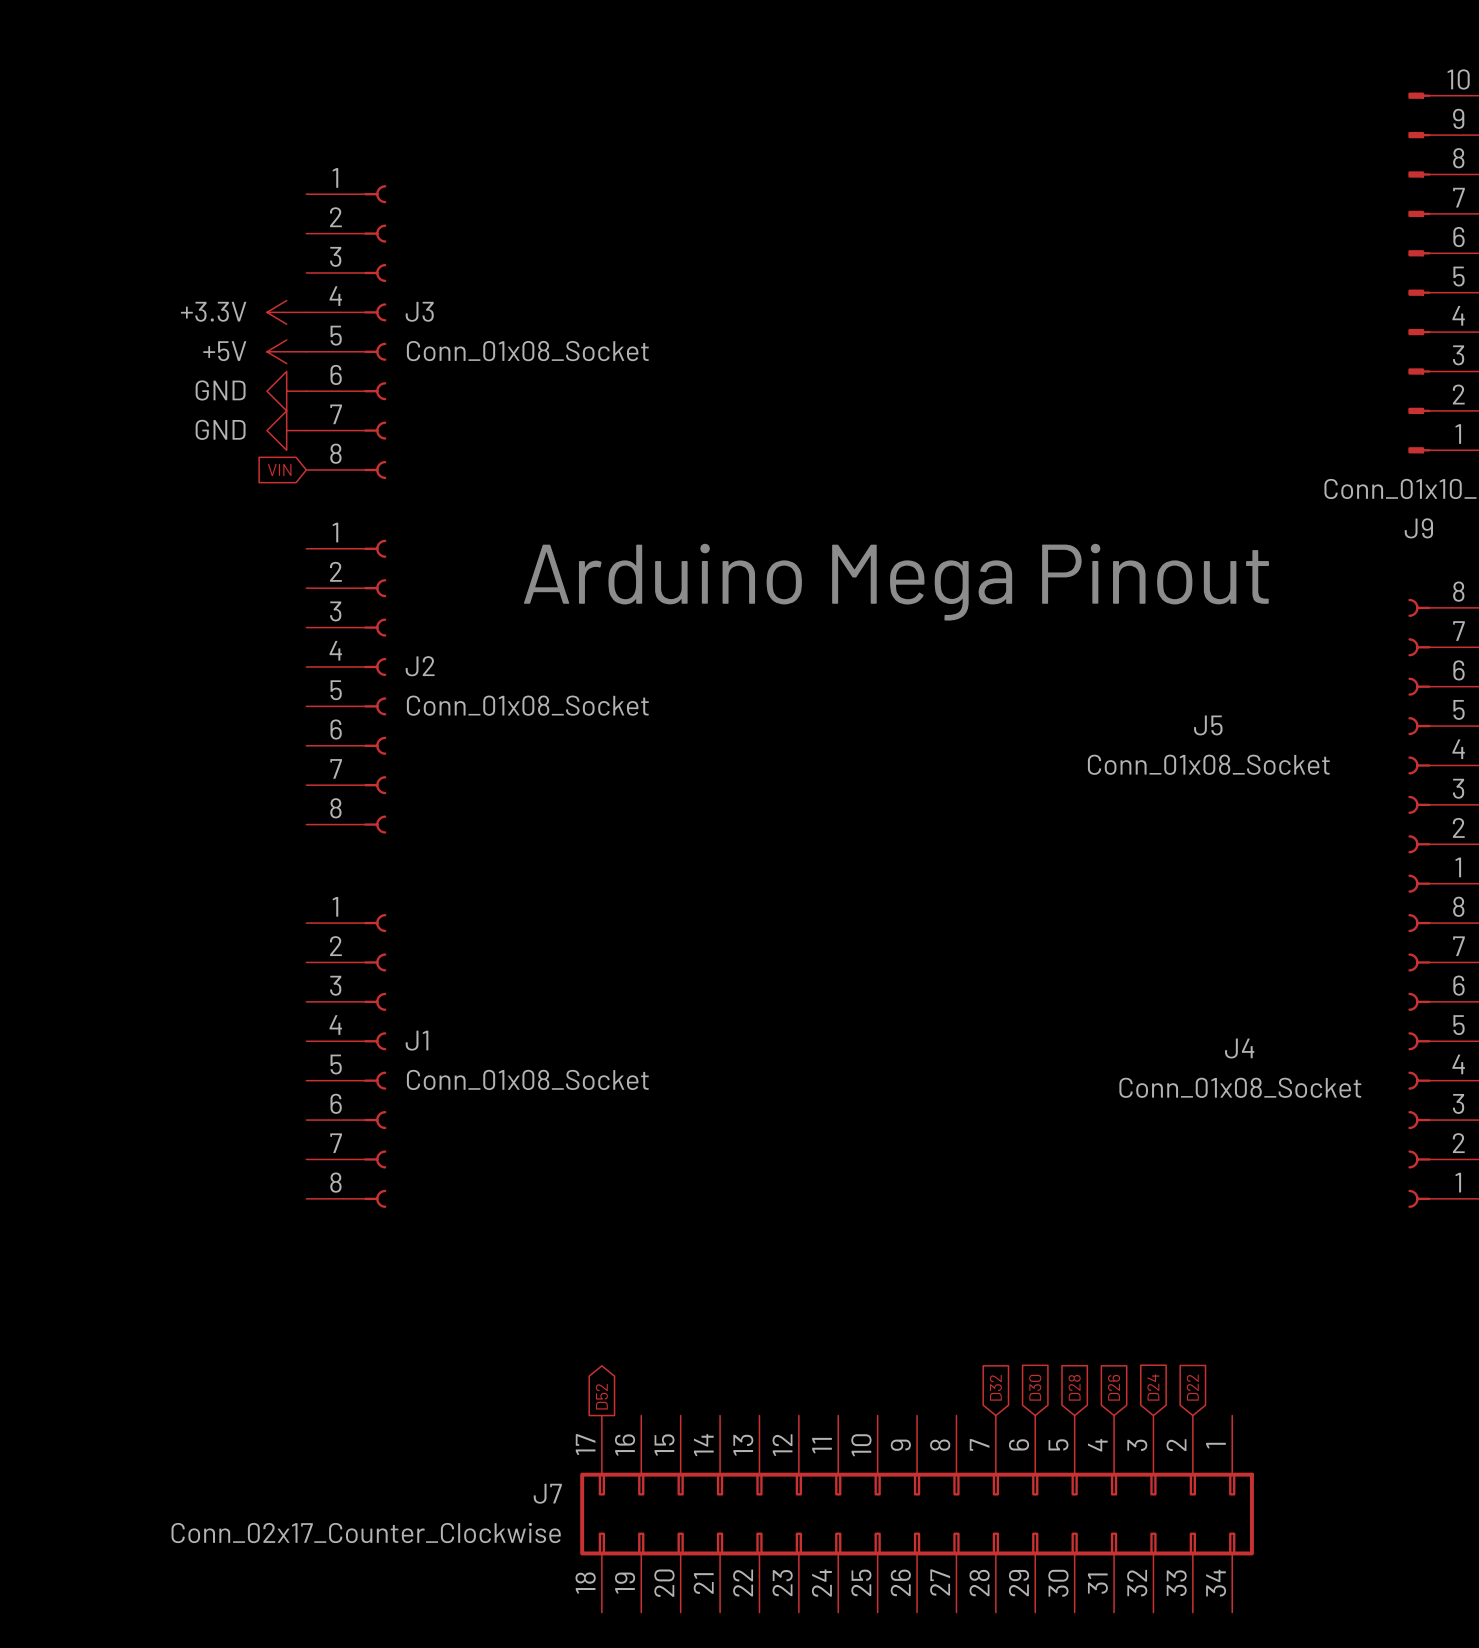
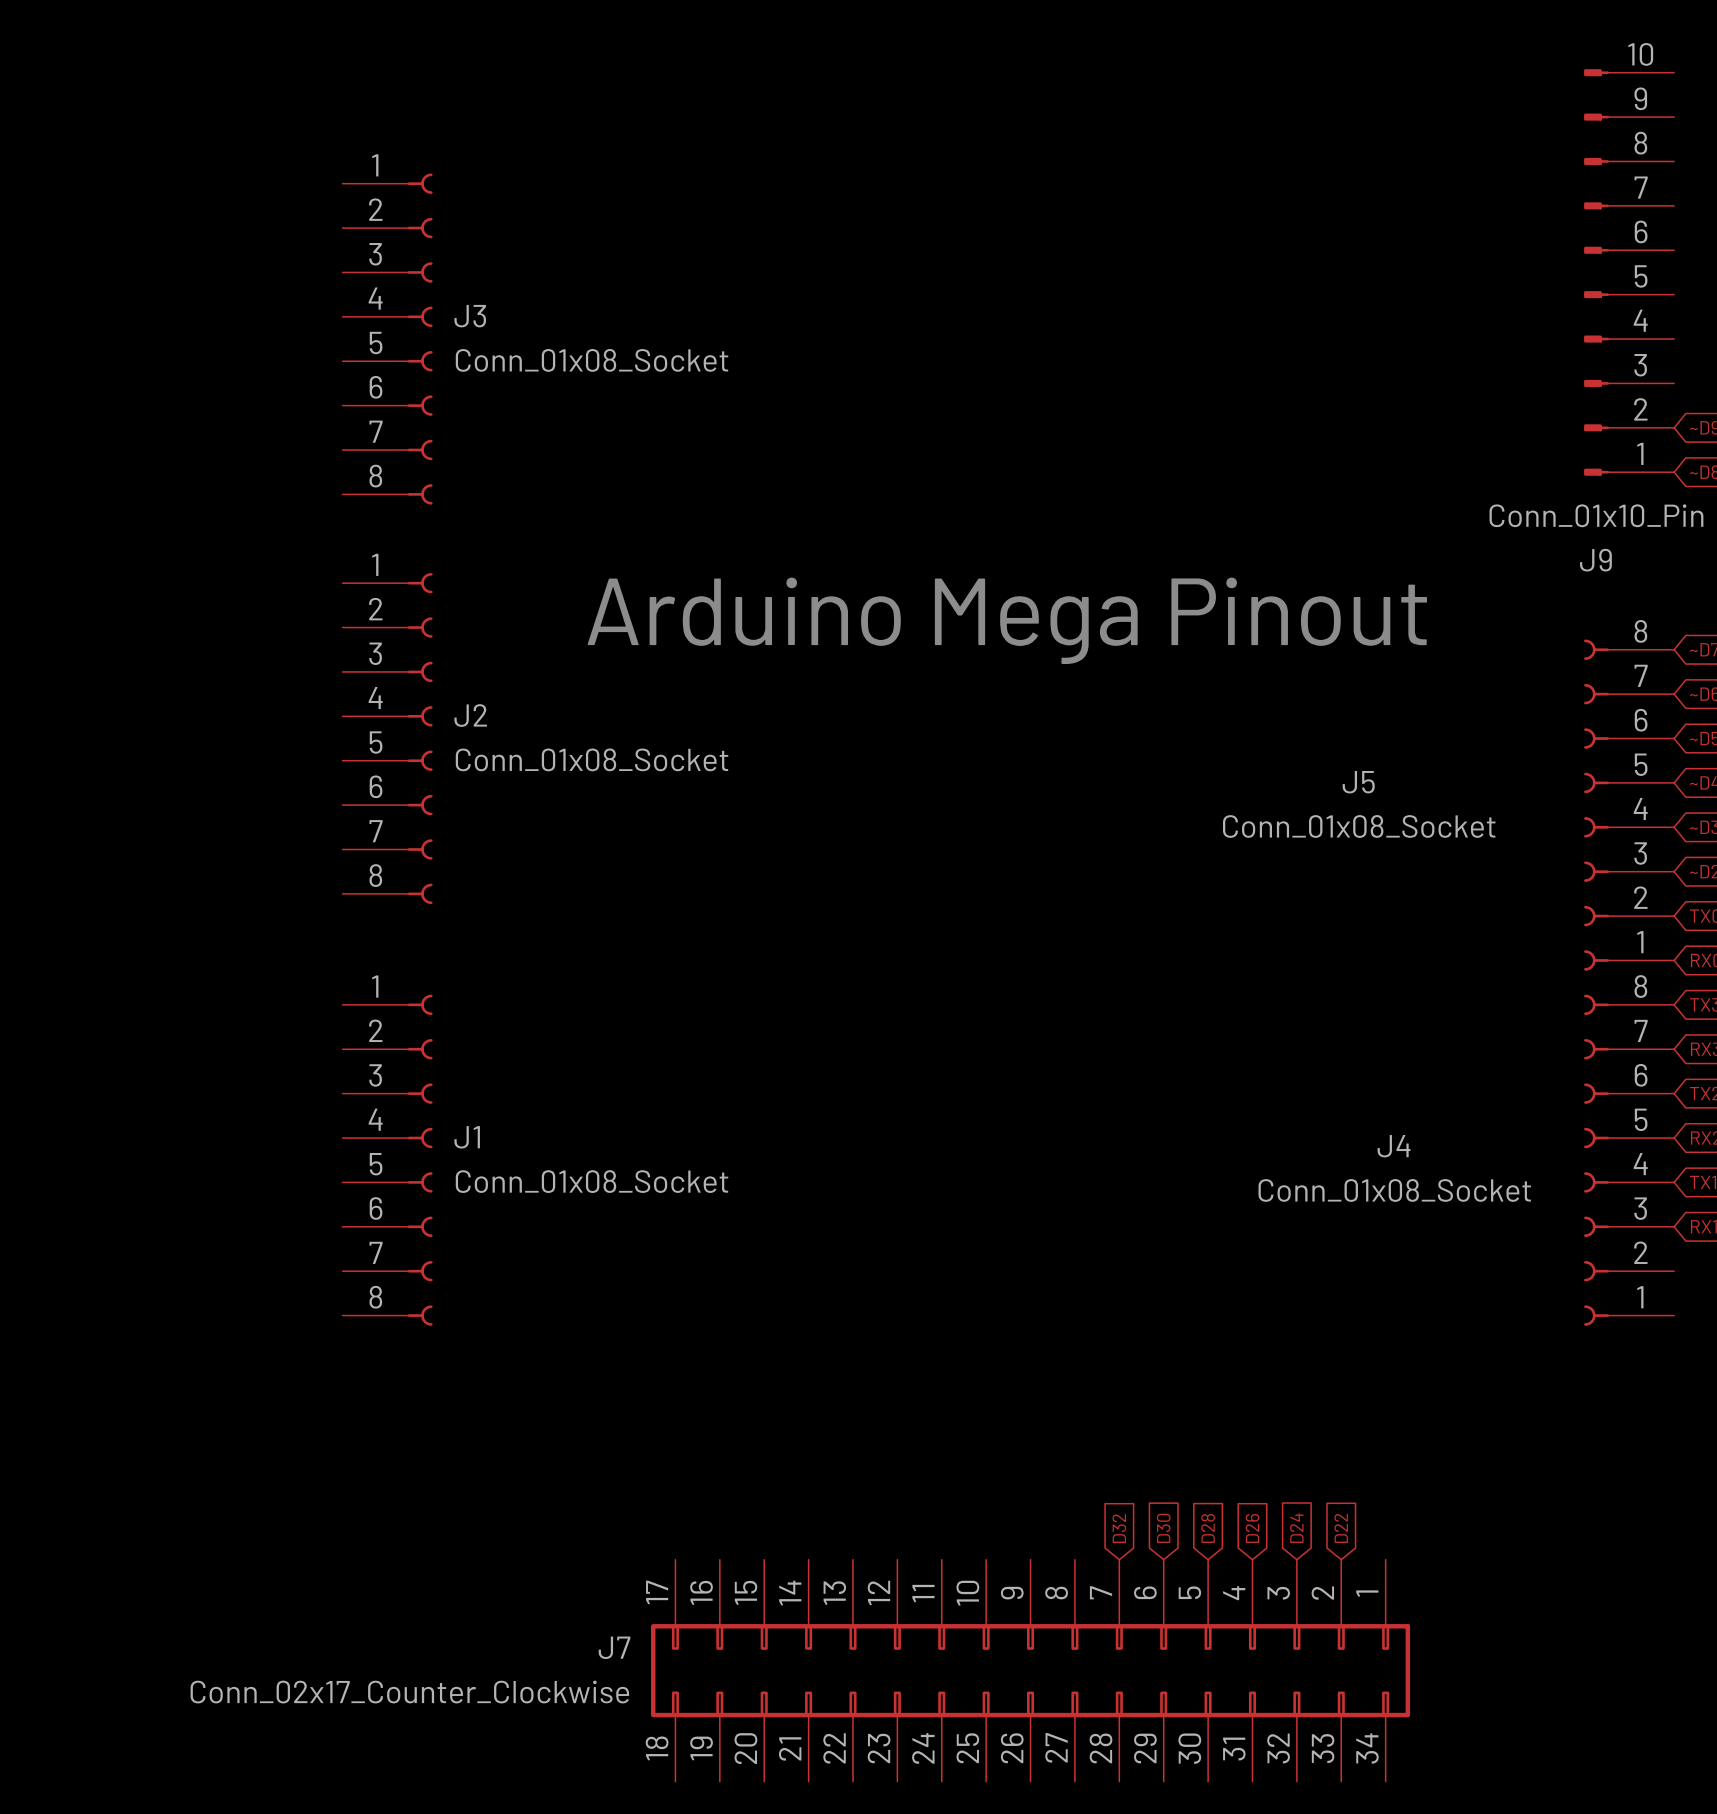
power symbol: +3.3V (286, 312) -> none
power symbol: +5V (286, 351) -> none
power symbol: GND (286, 391) -> none
power symbol: GND (286, 430) -> none
global label: VIN (279, 469) -> none
global label: D52 (601, 1396) -> none

